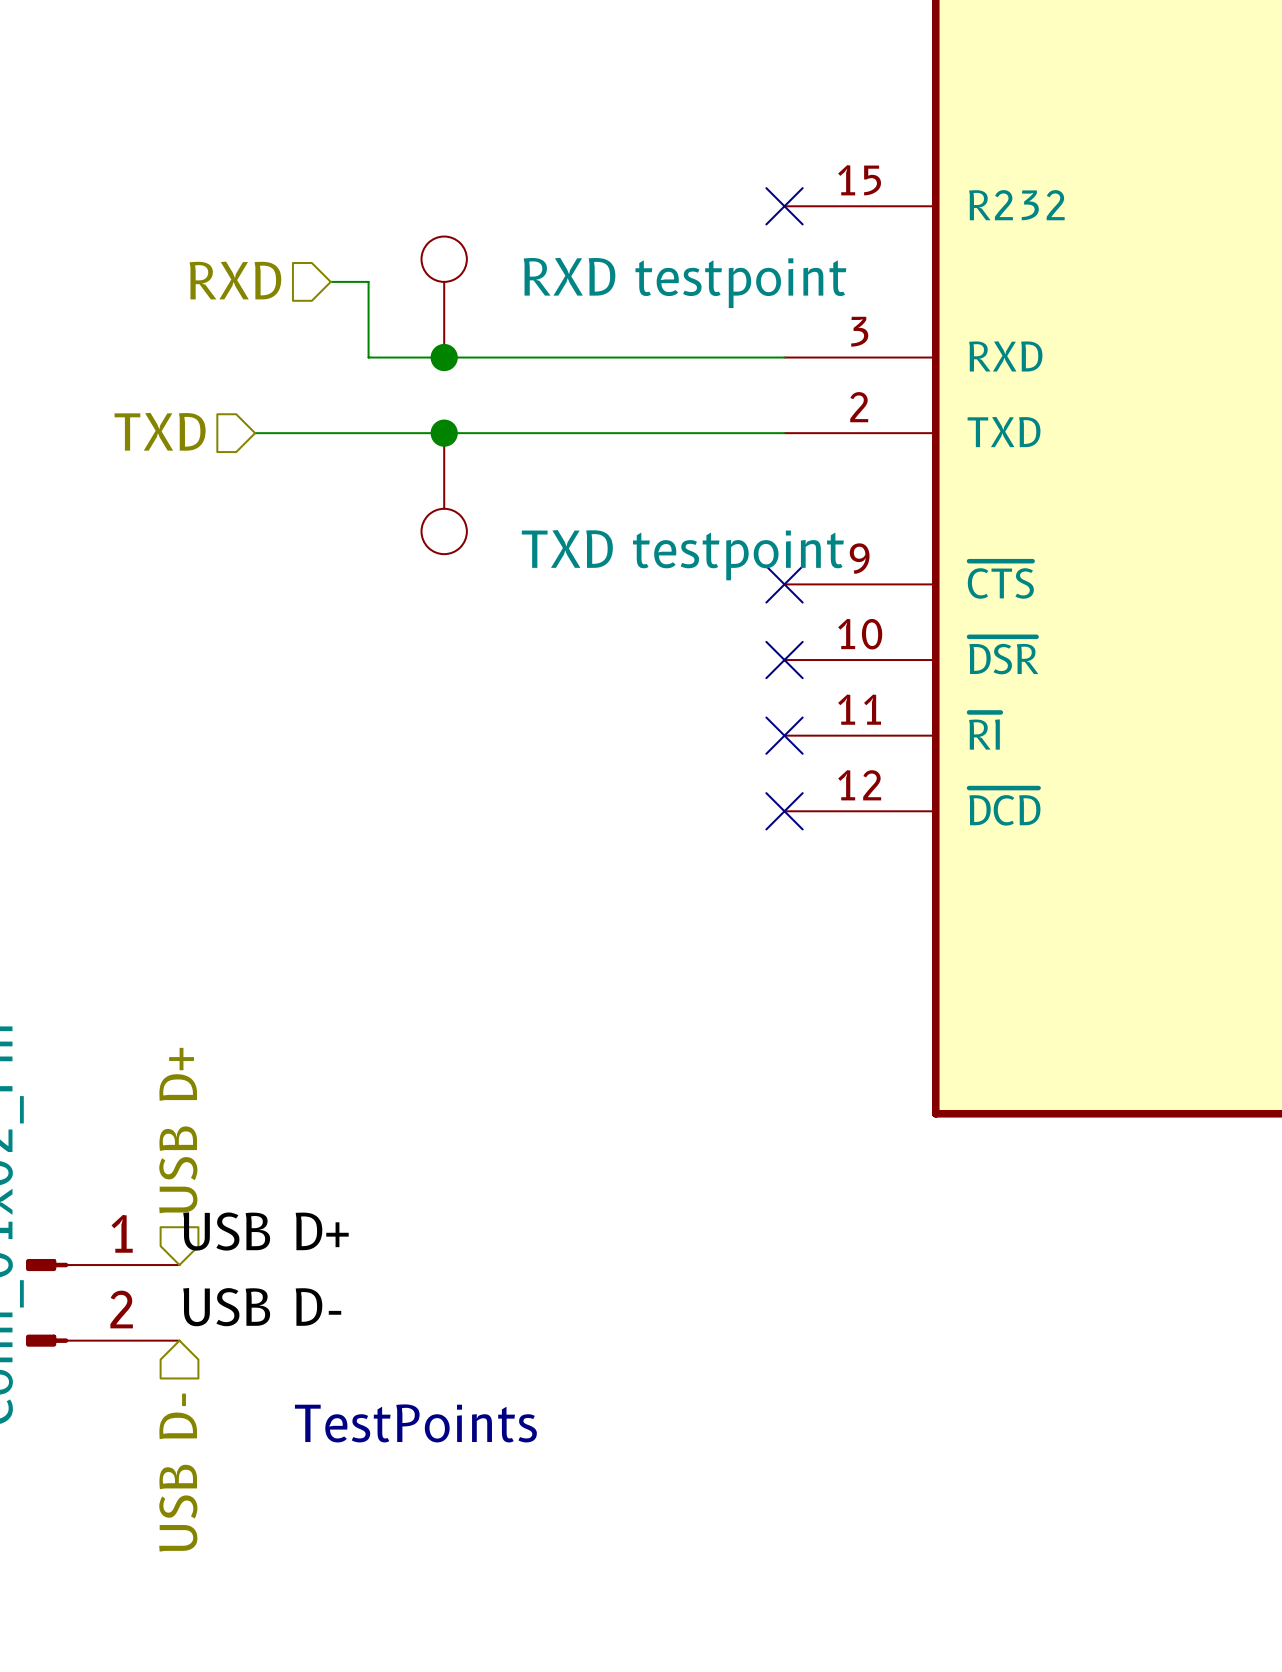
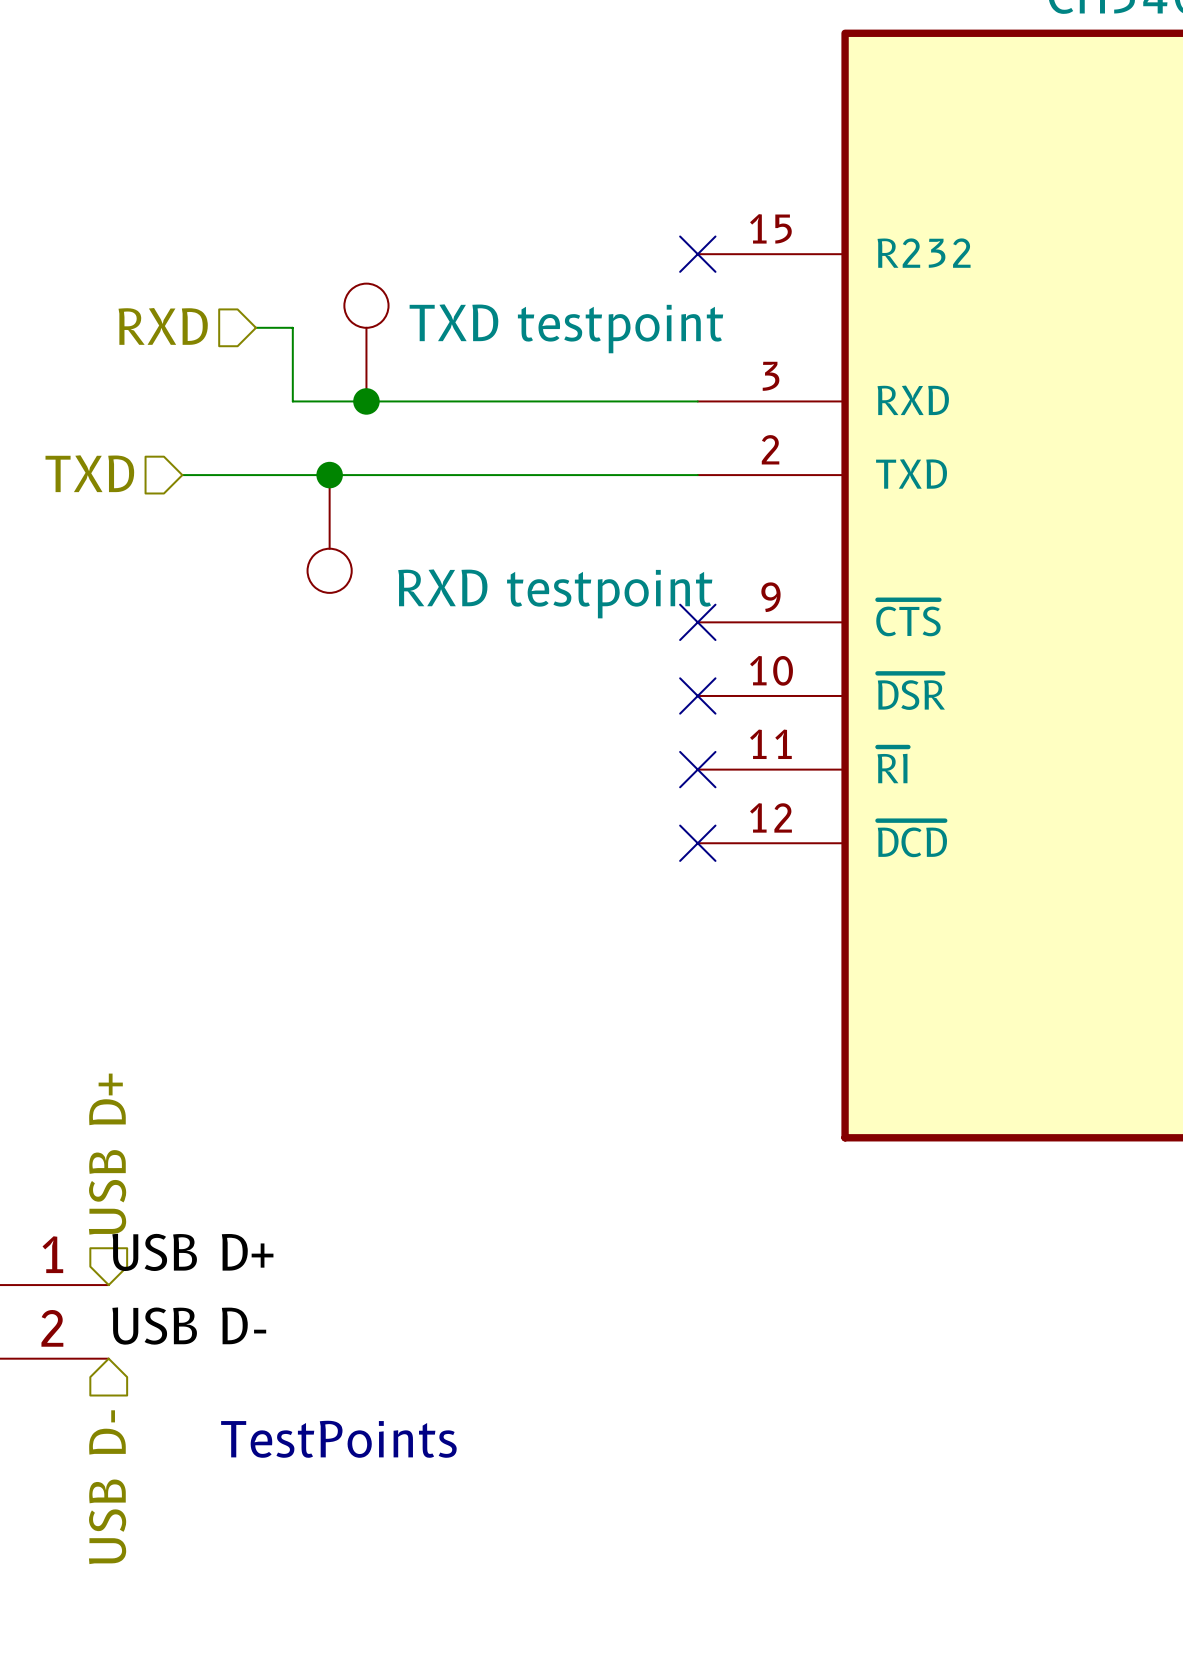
part value: RXD testpoint (685, 282) -> TXD testpoint (566, 328)
junction position: (444, 433) -> (329, 475)
part: none -> RXD testpoint (329, 533)
part: TXD testpoint (444, 493) -> none

